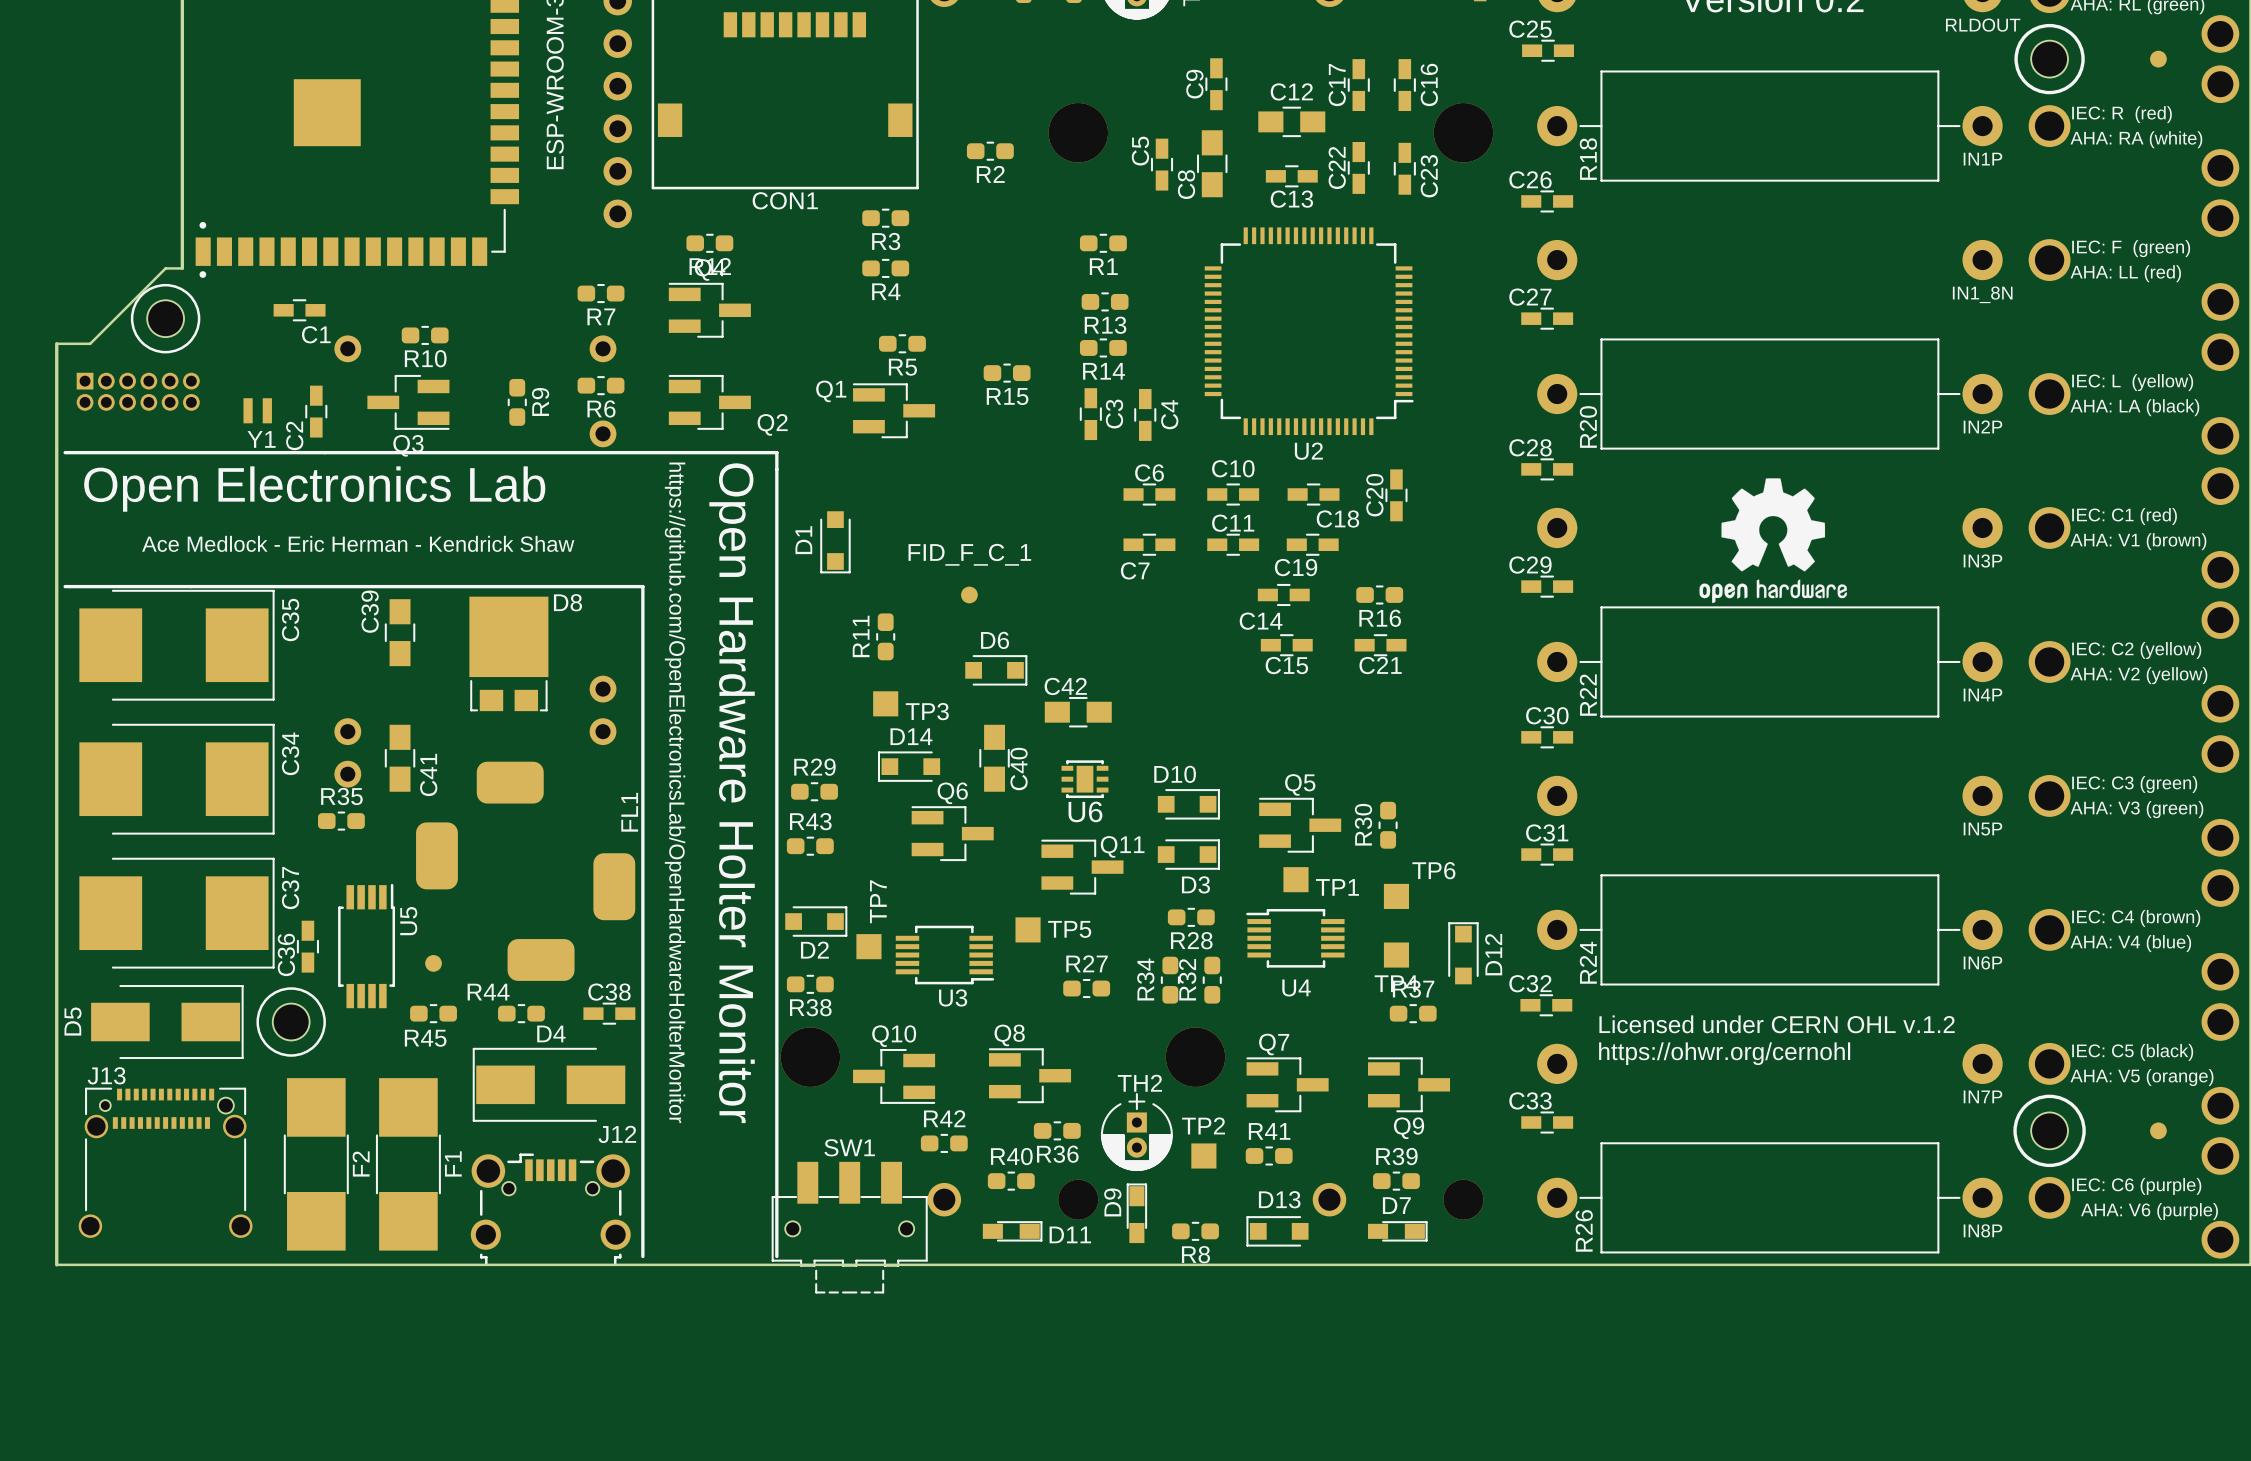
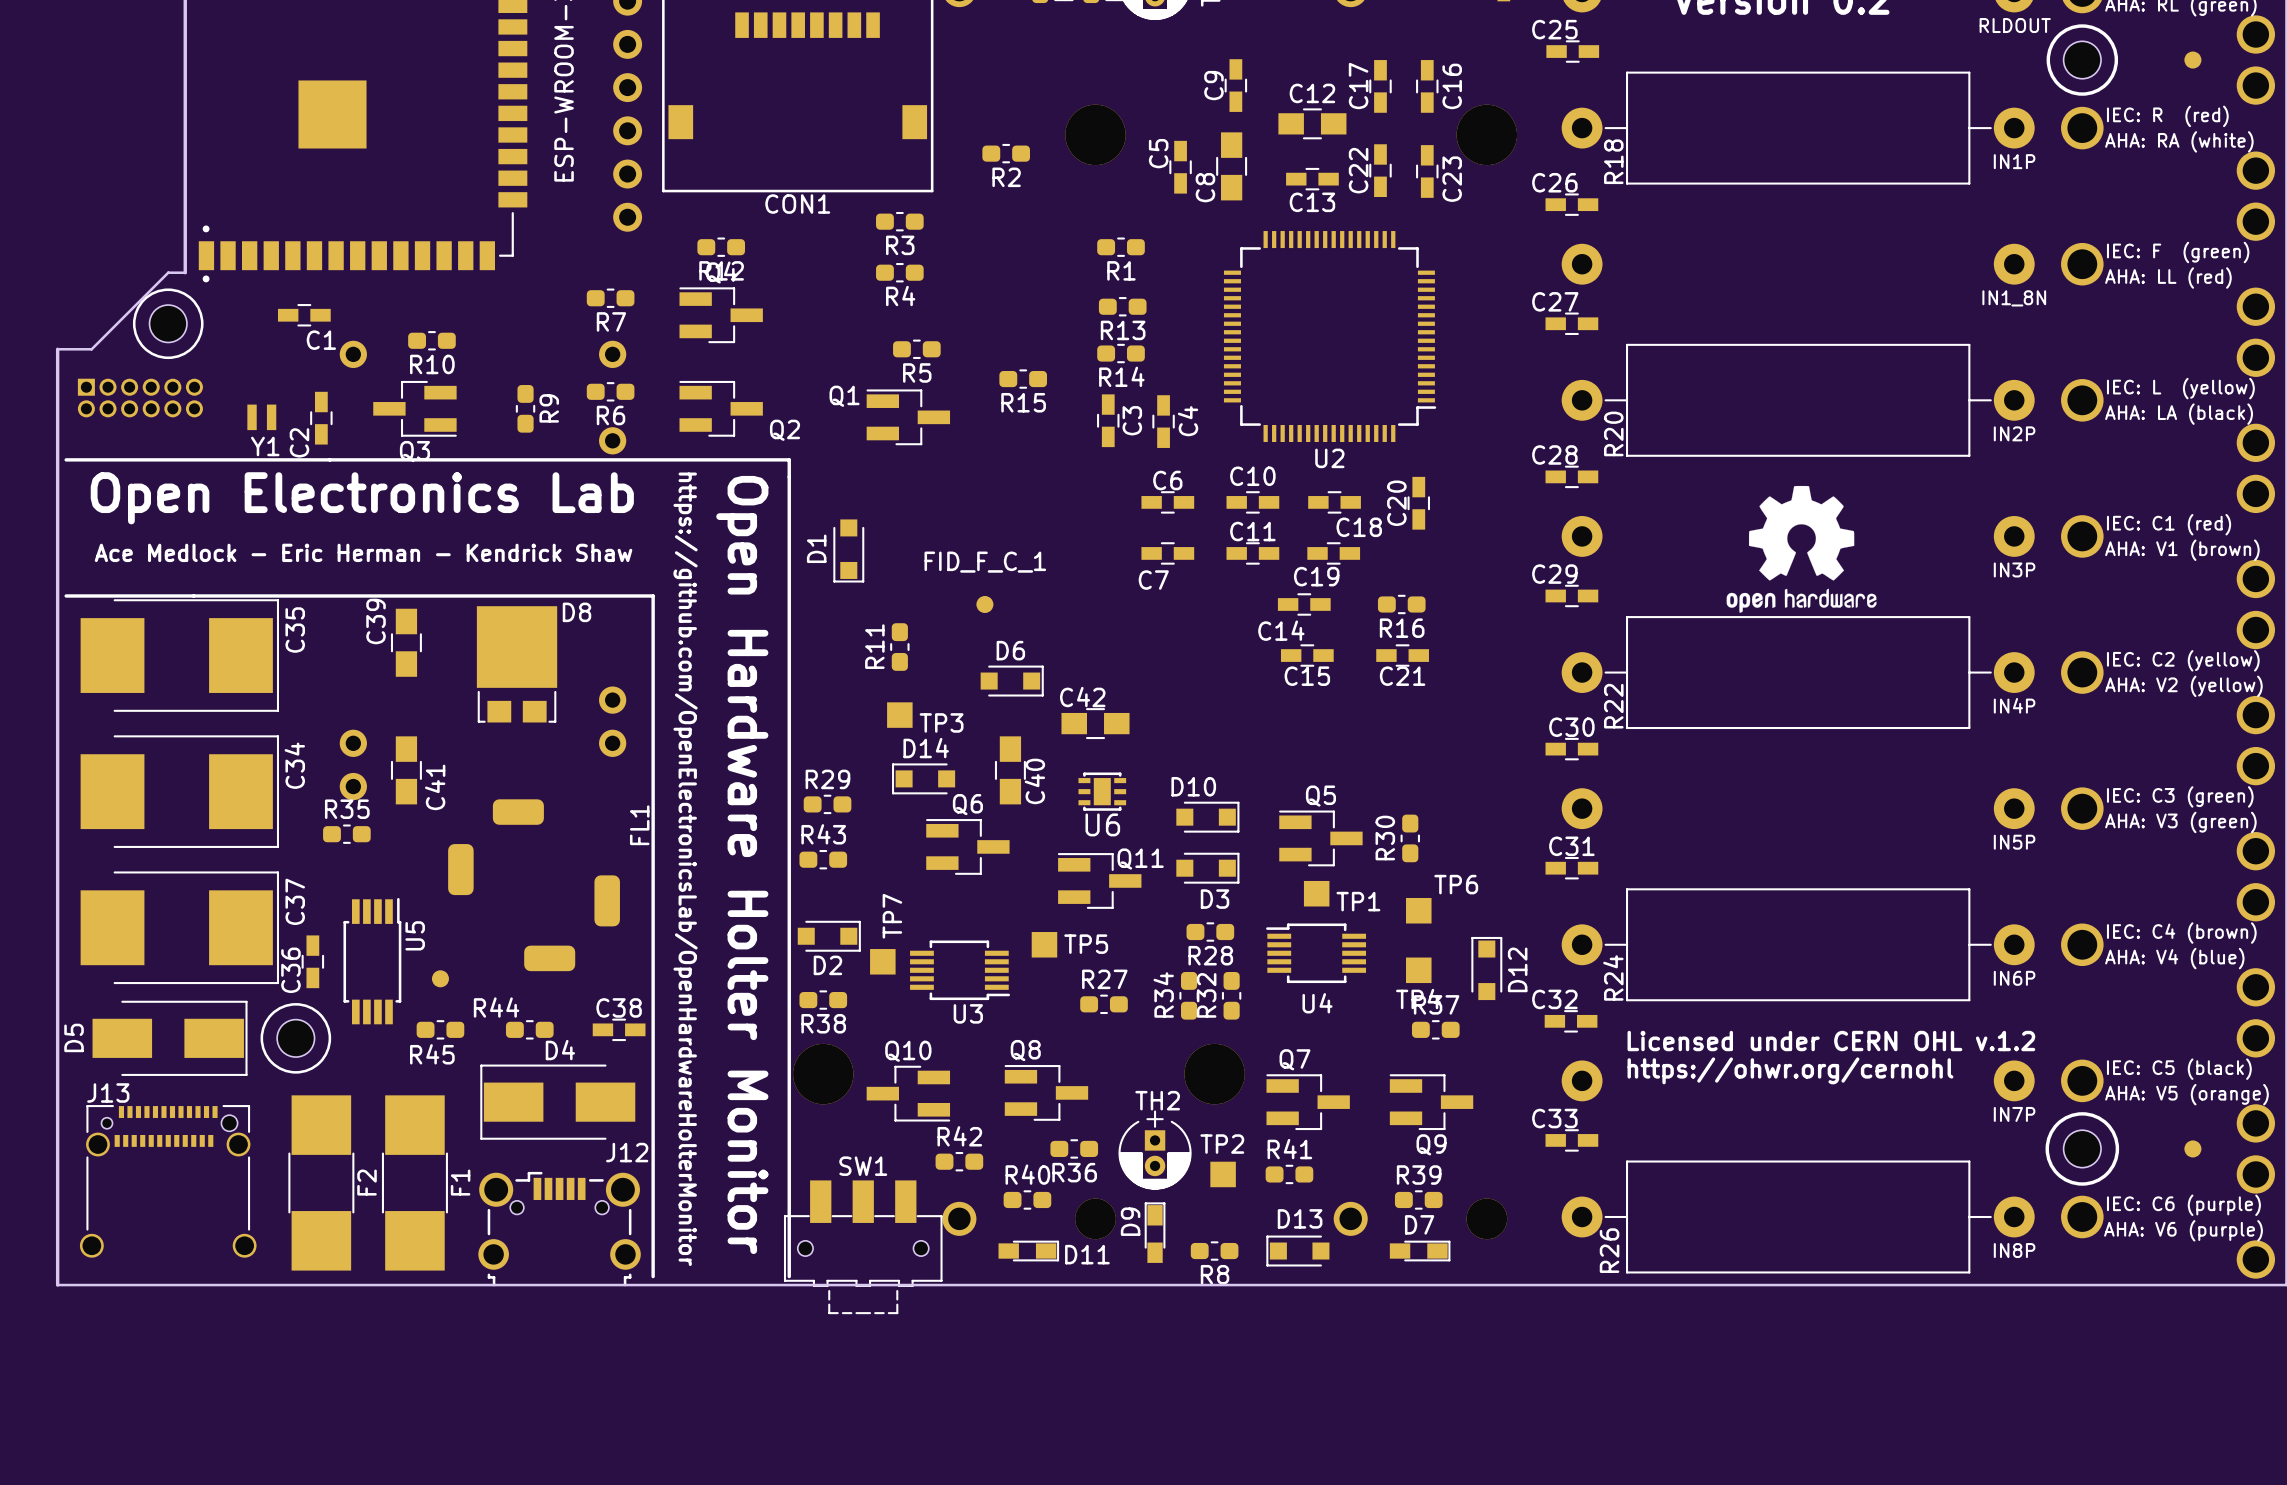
FL1 footprint: [416, 761, 636, 981] -> [448, 799, 620, 972]

